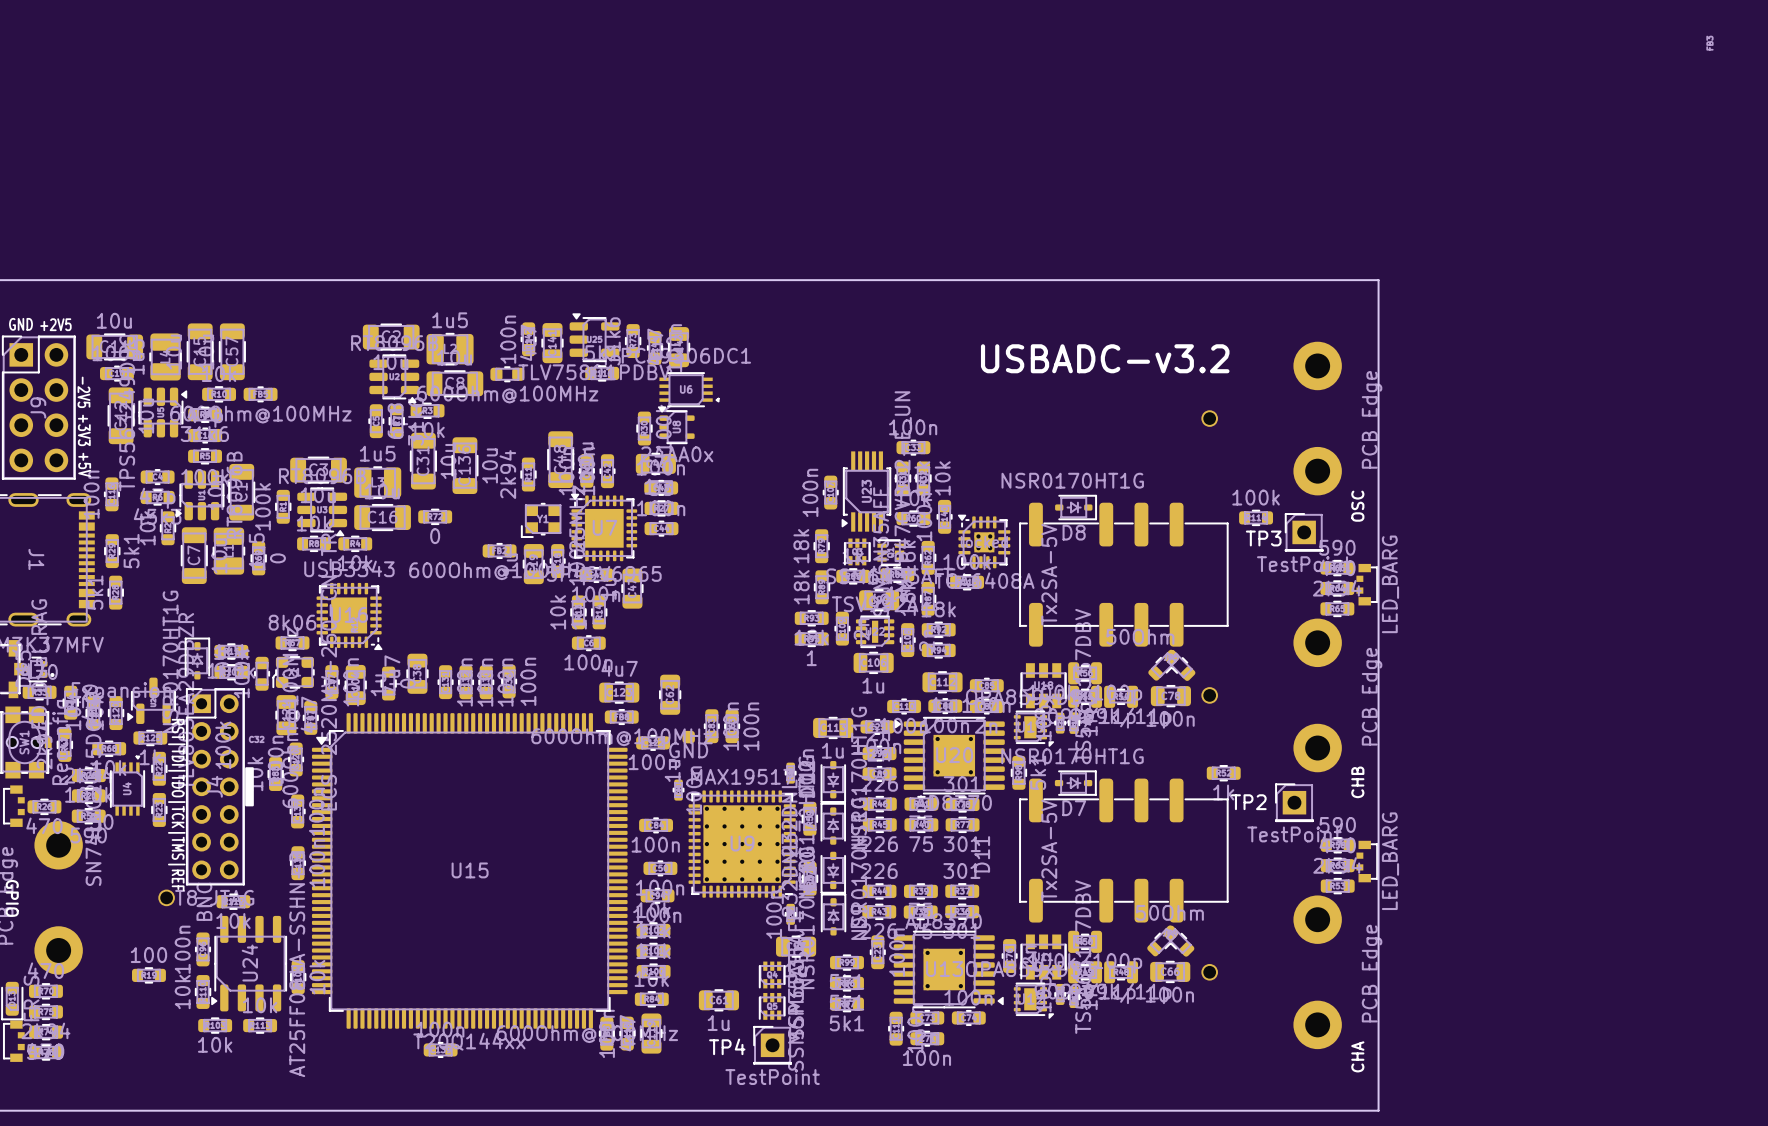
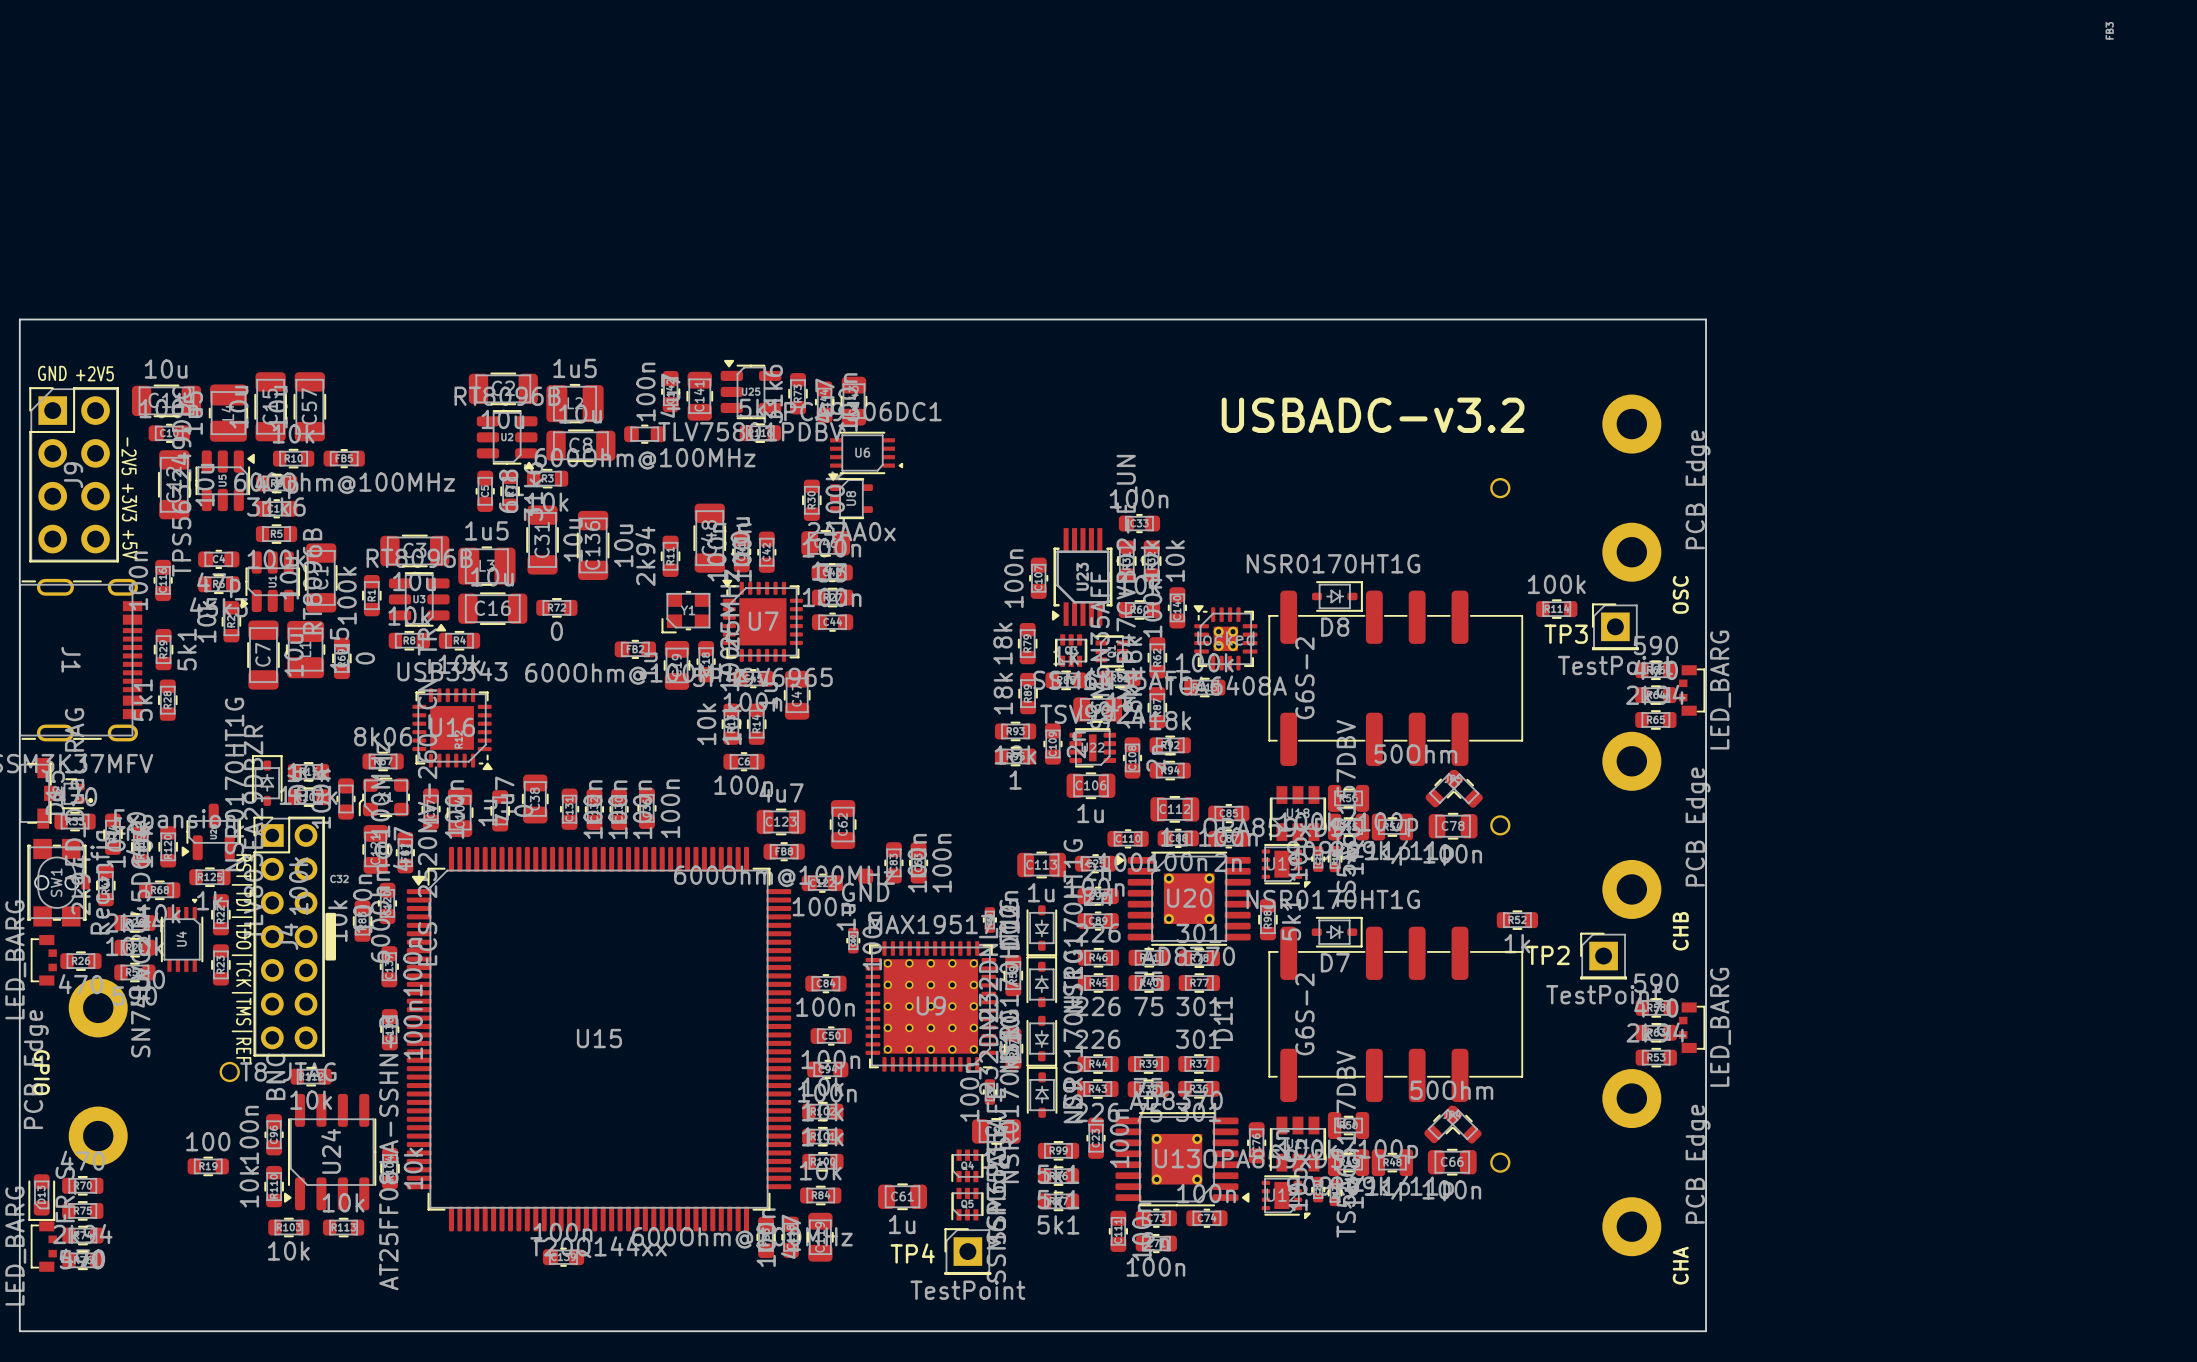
part value: Tx2SA-5V (1049, 574) -> G6S-2 (1304, 678)
part value: Tx2SA-5V (1049, 850) -> G6S-2 (1304, 1014)

